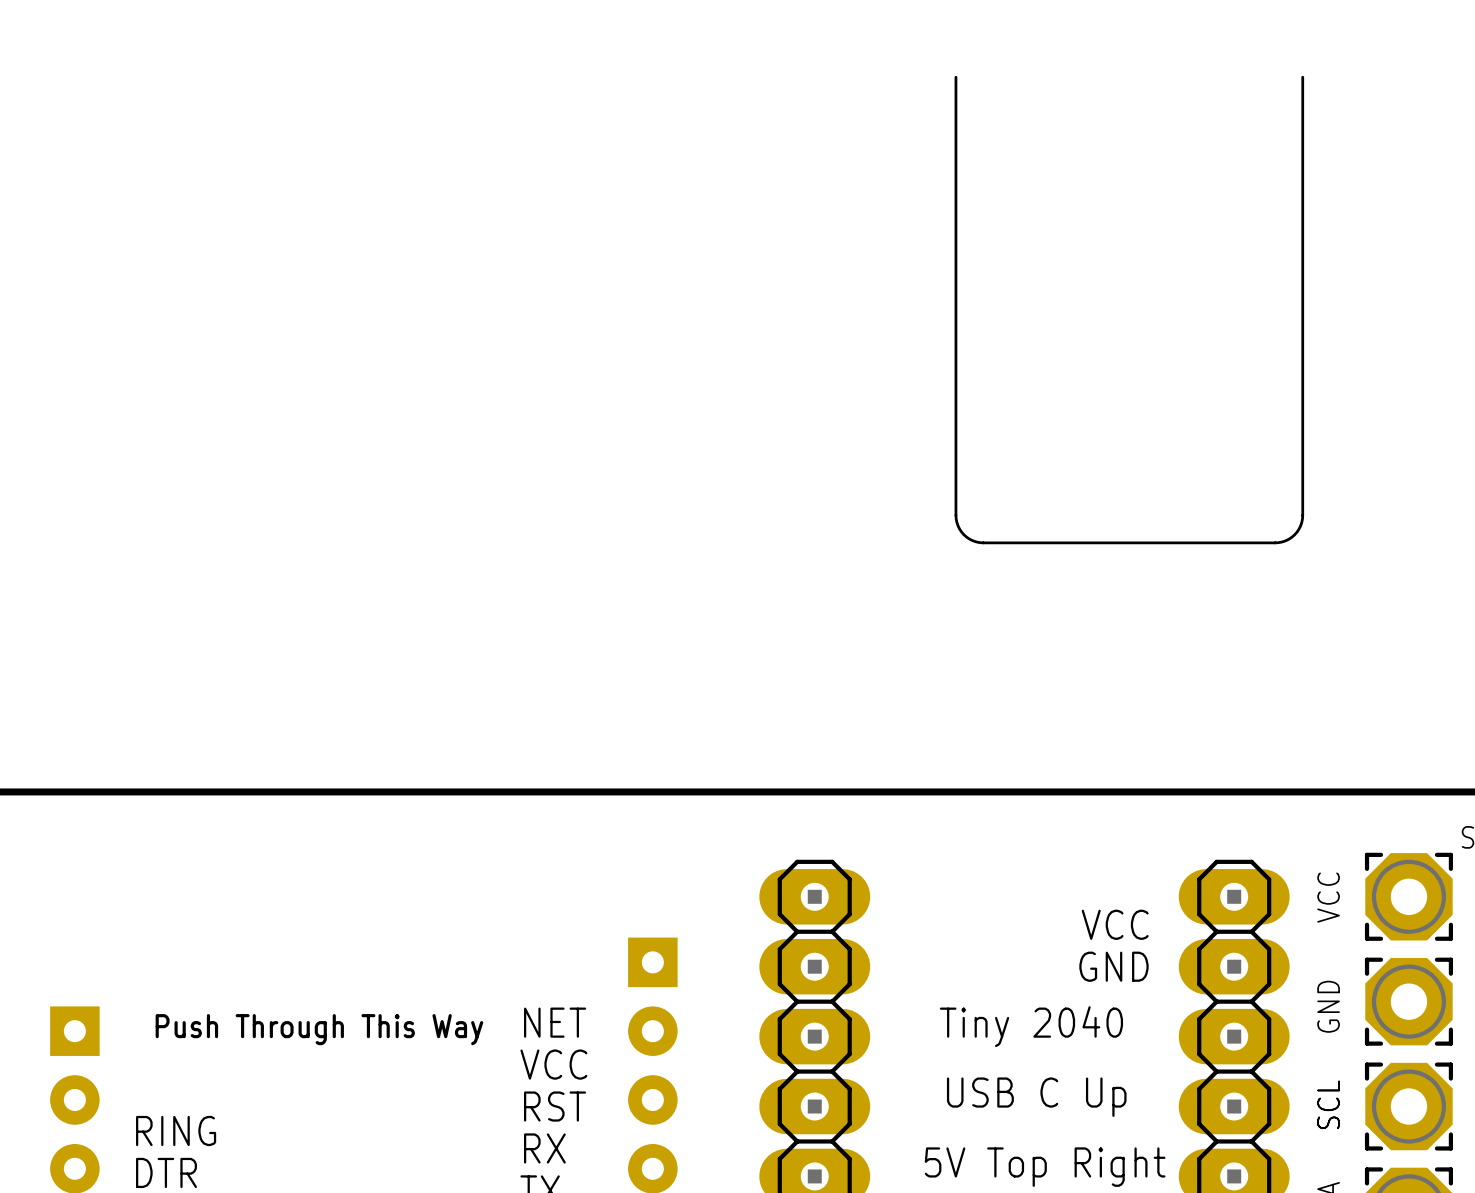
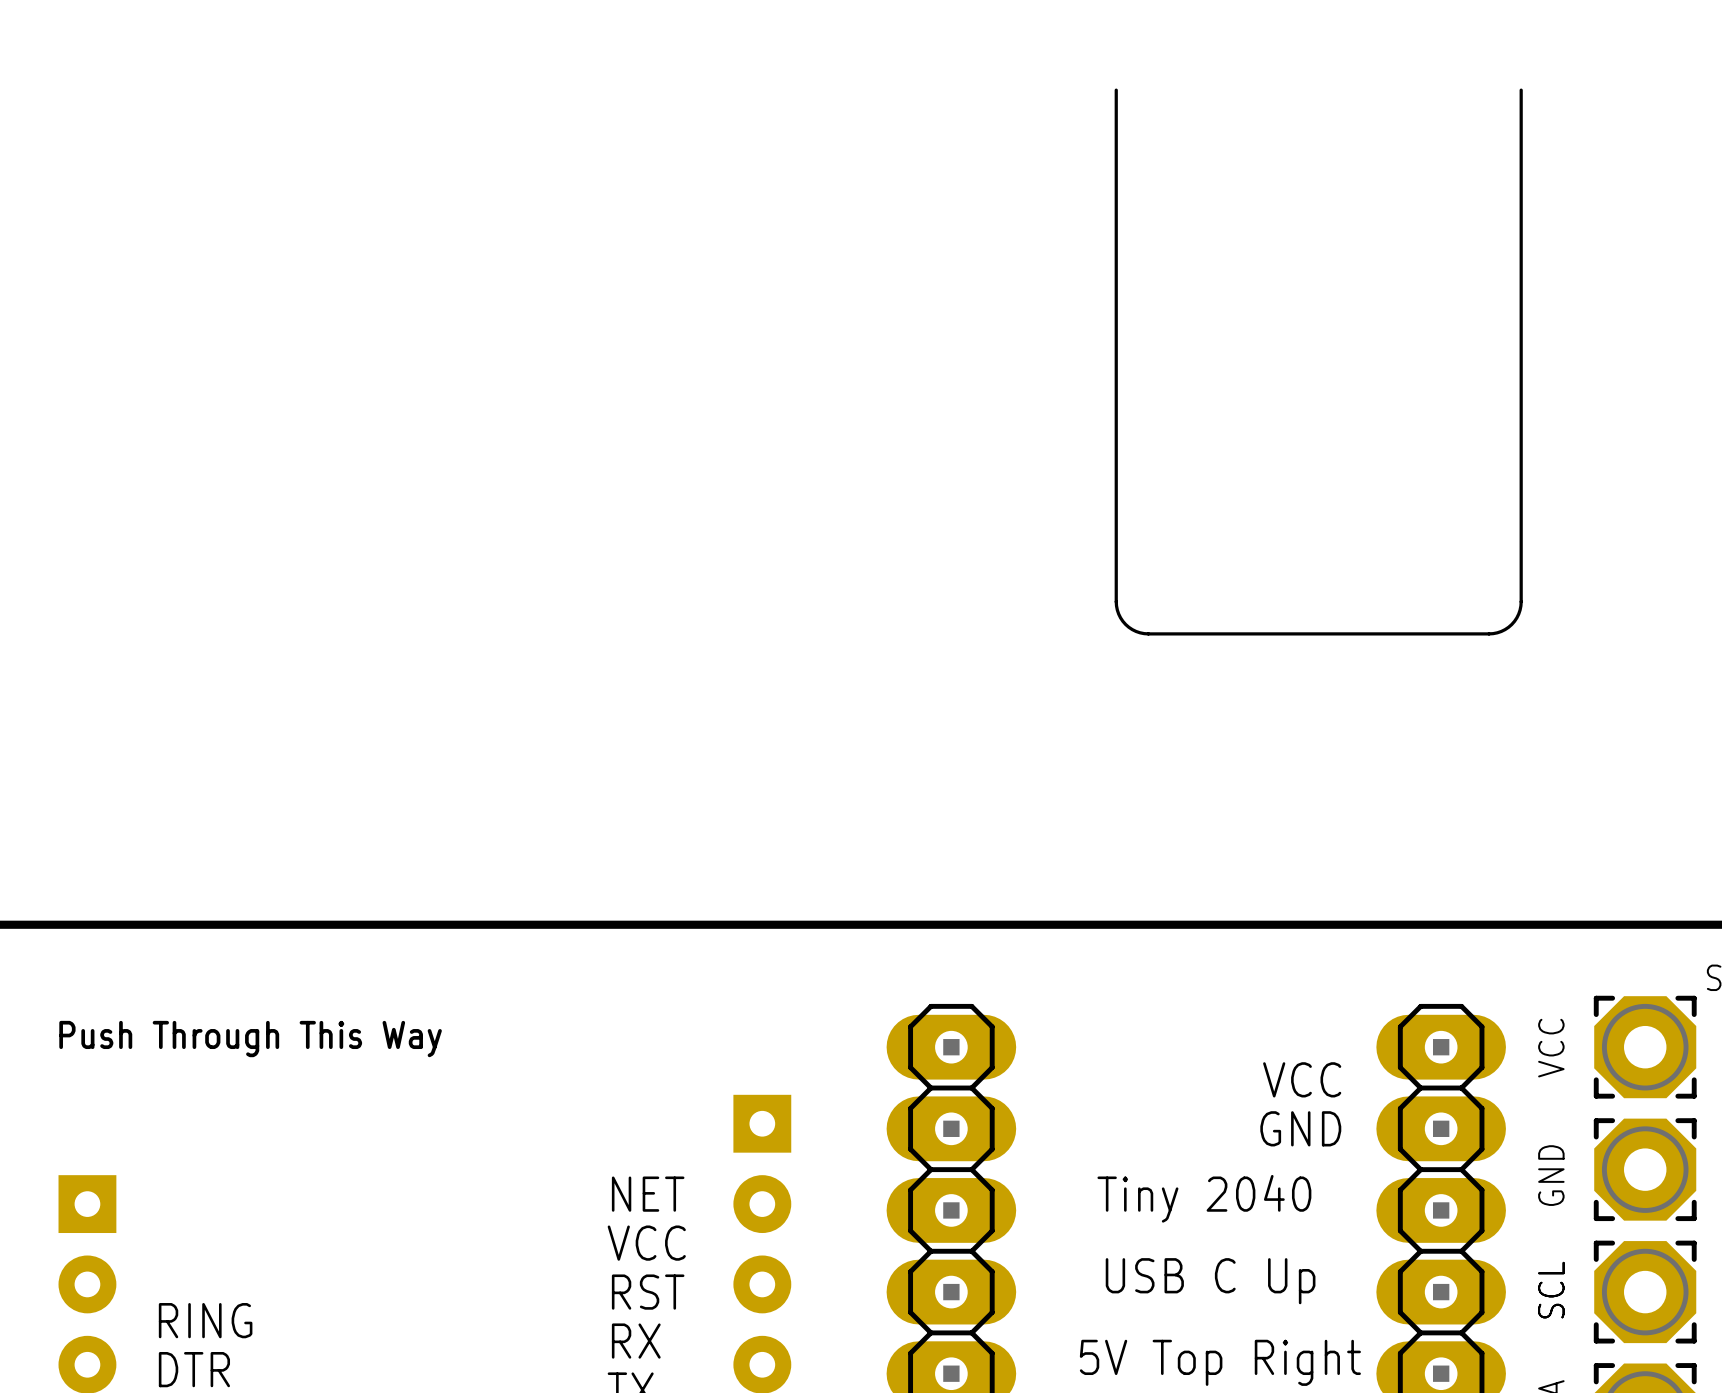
text position: Push Through This Way (319, 1029) -> Push Through This Way (250, 1039)

